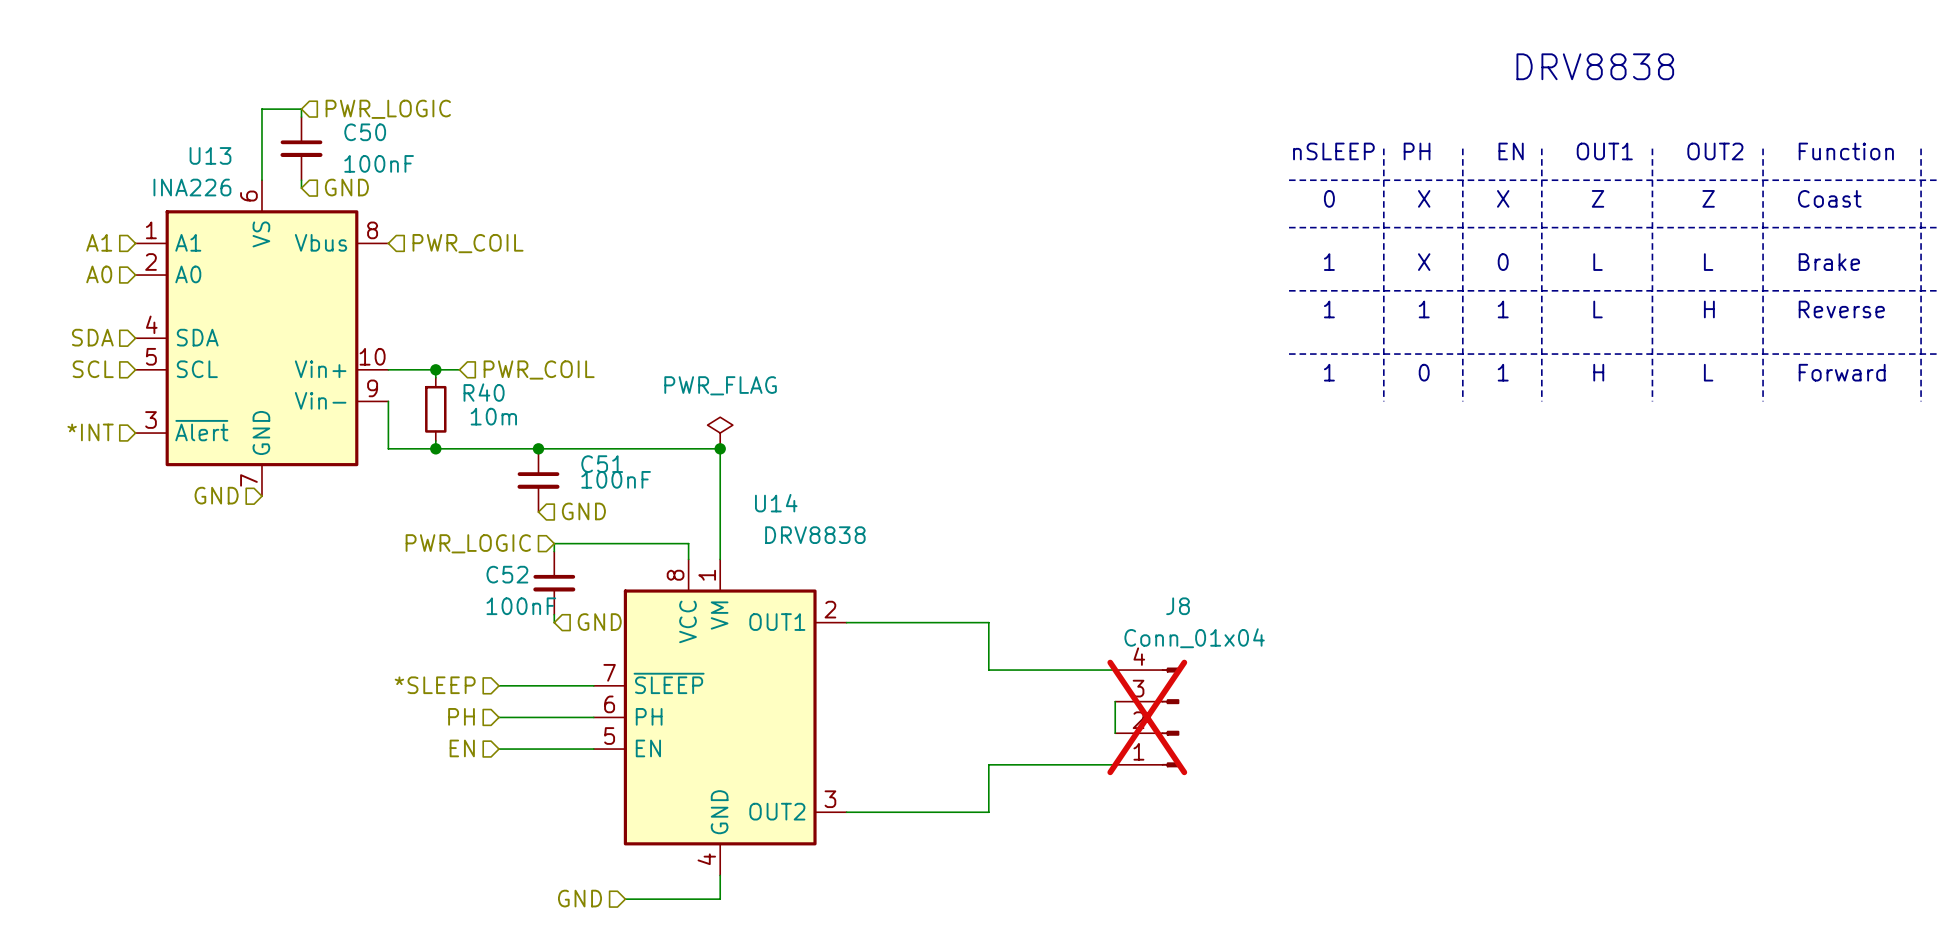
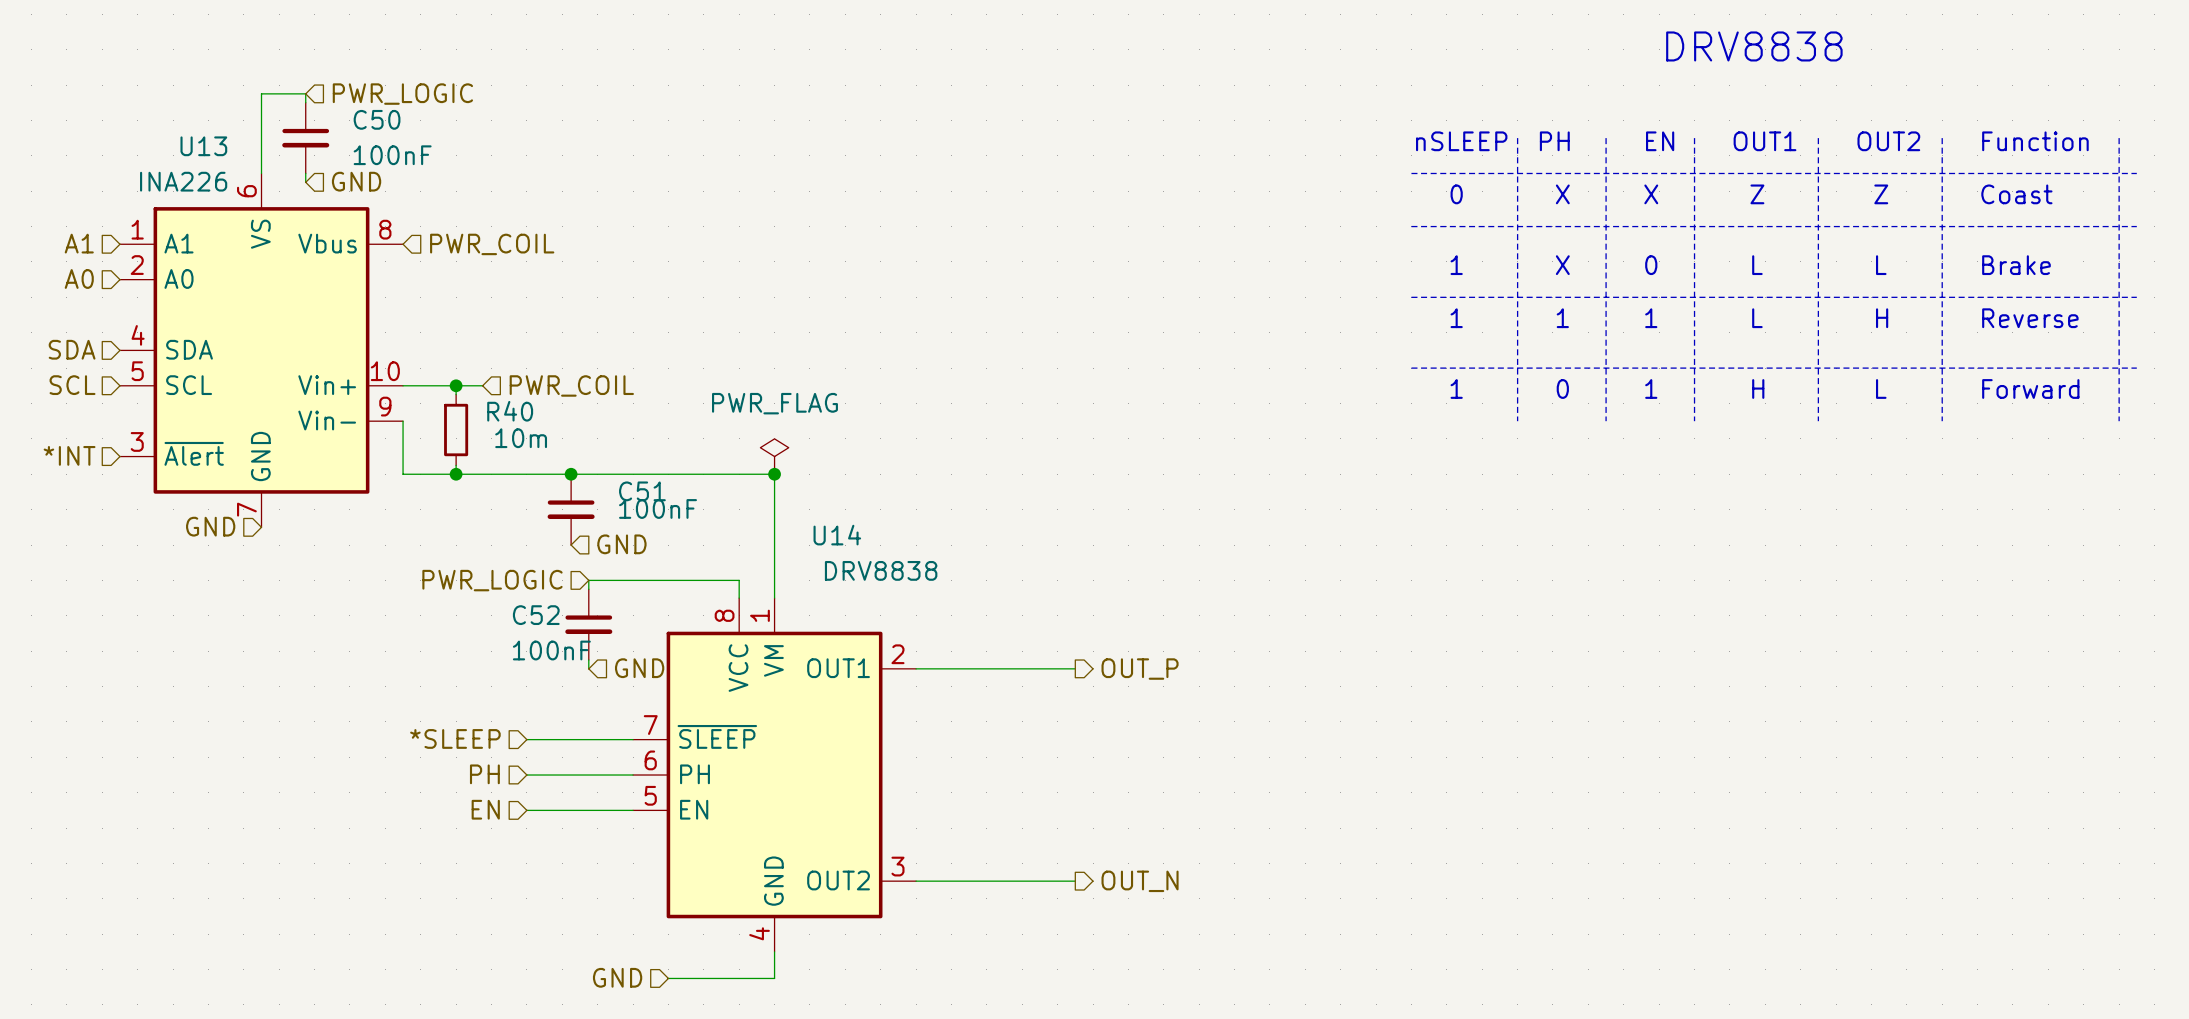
wire: (988, 622) (988, 670) (1115, 670) -> none
hierarchical label: none -> OUT_P (1140, 669)
wire: (1115, 701) (1115, 733) -> none
J8: Conn_01x04 (1147, 717) -> none
wire: (1115, 764) (988, 764) (988, 812) -> none
hierarchical label: none -> OUT_N (1140, 881)

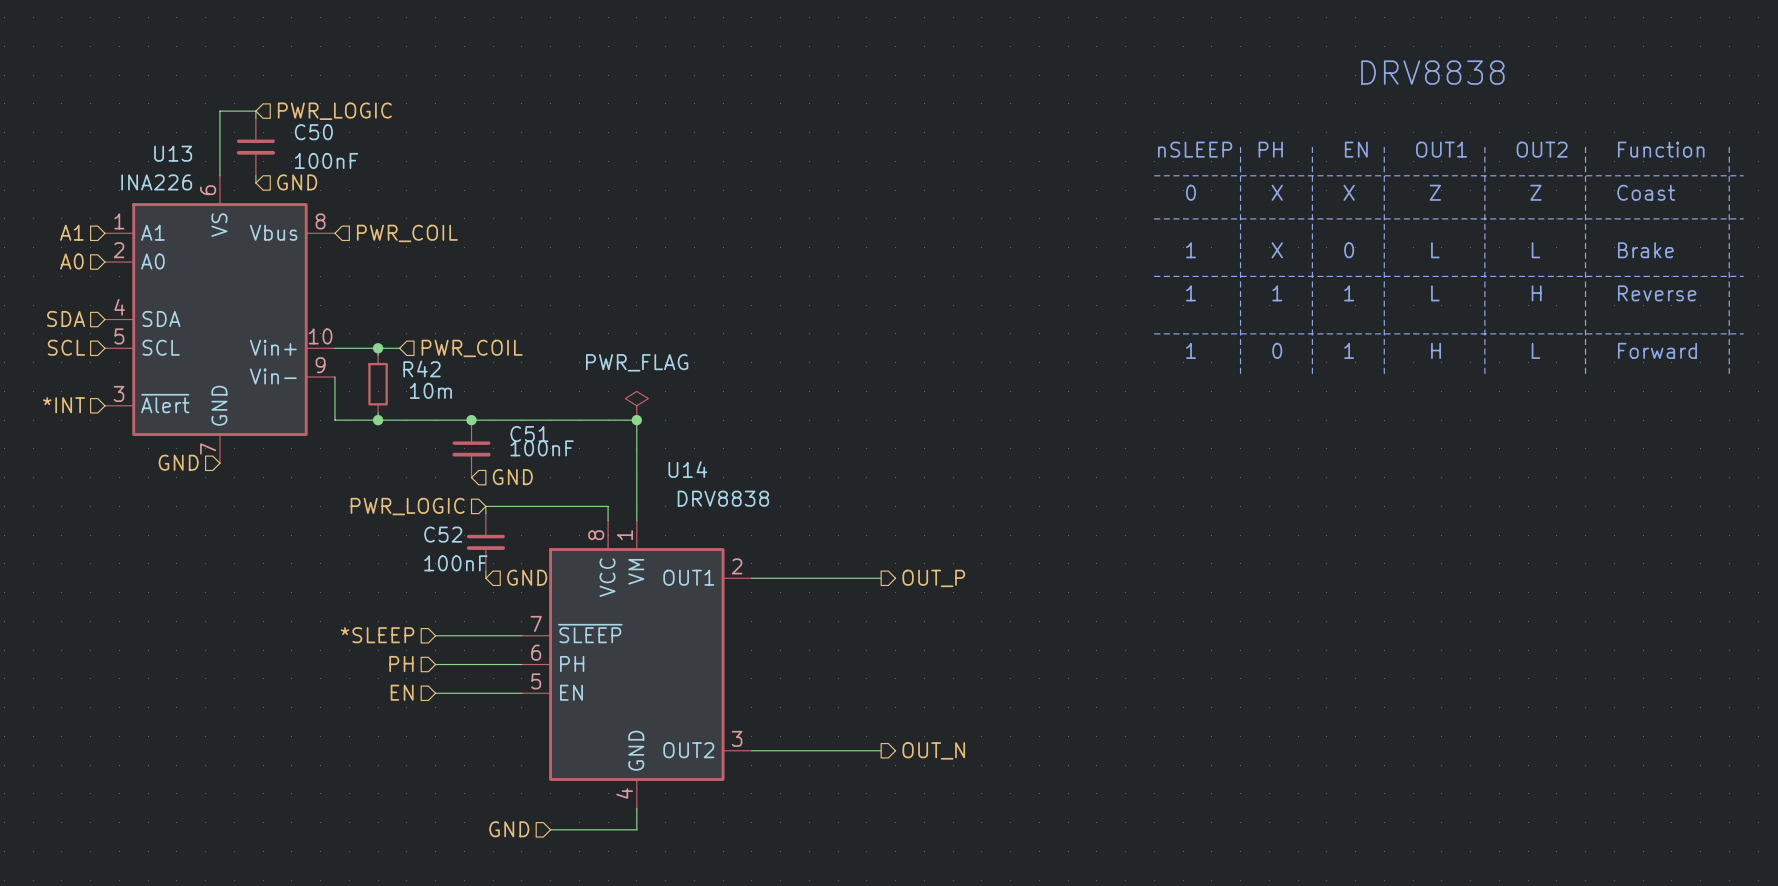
R40 name: R40 (510, 411) -> R42 (422, 368)

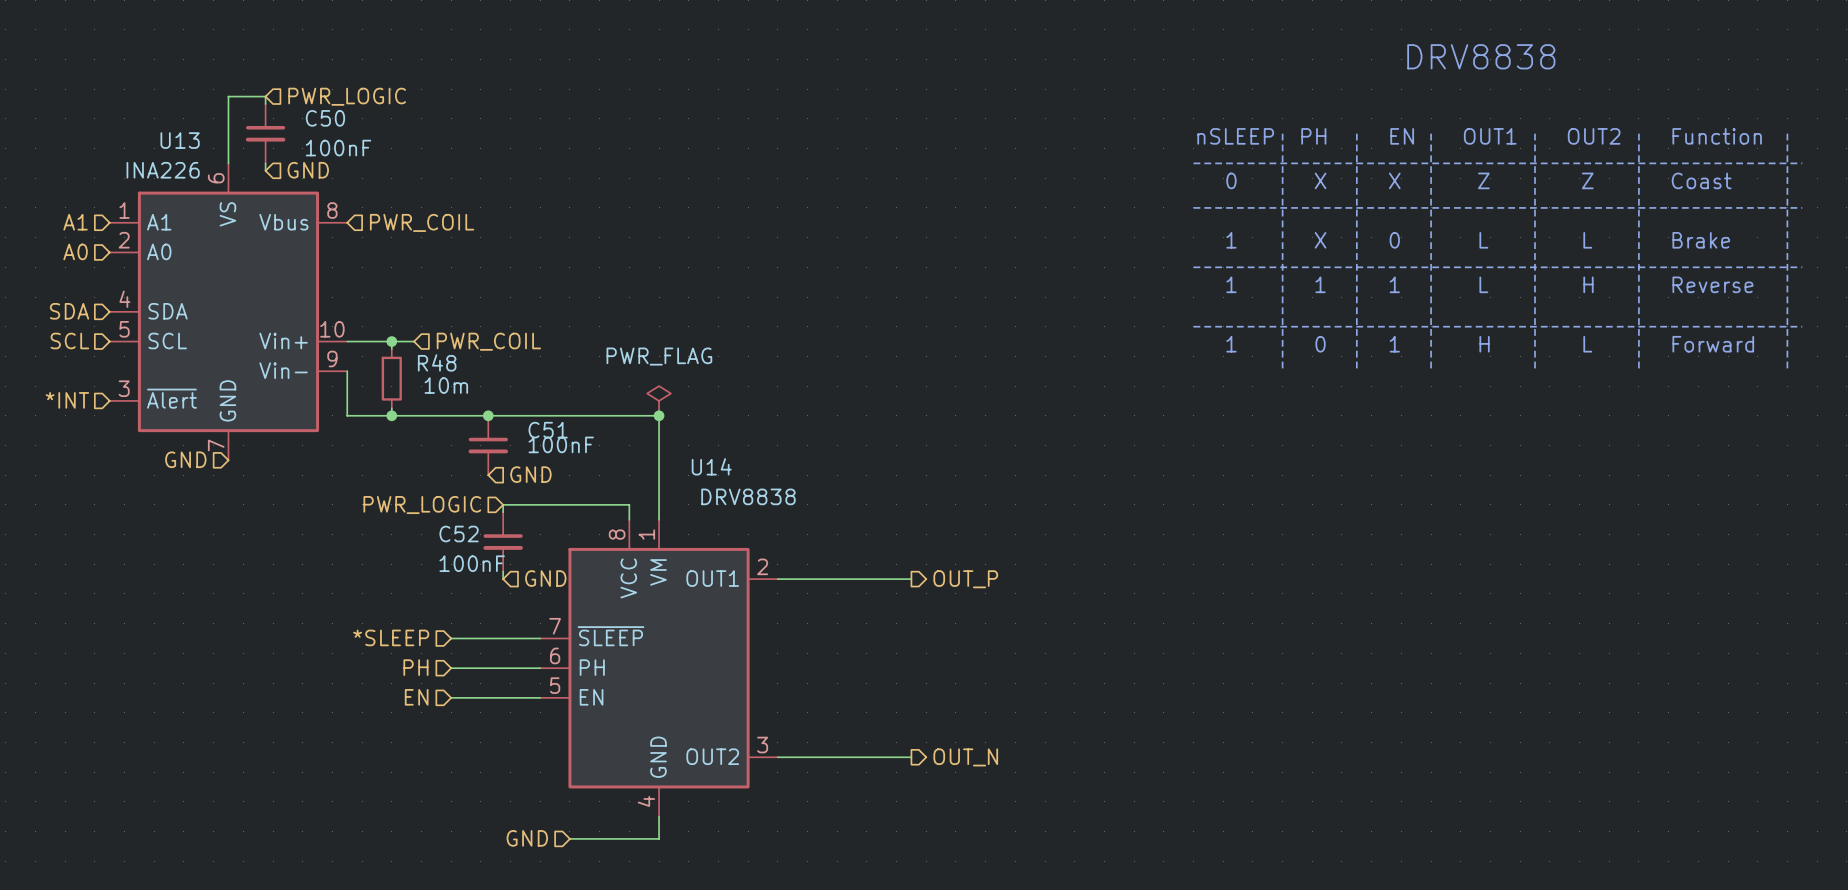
R42 name: R42 (422, 368) -> R48 (437, 362)

